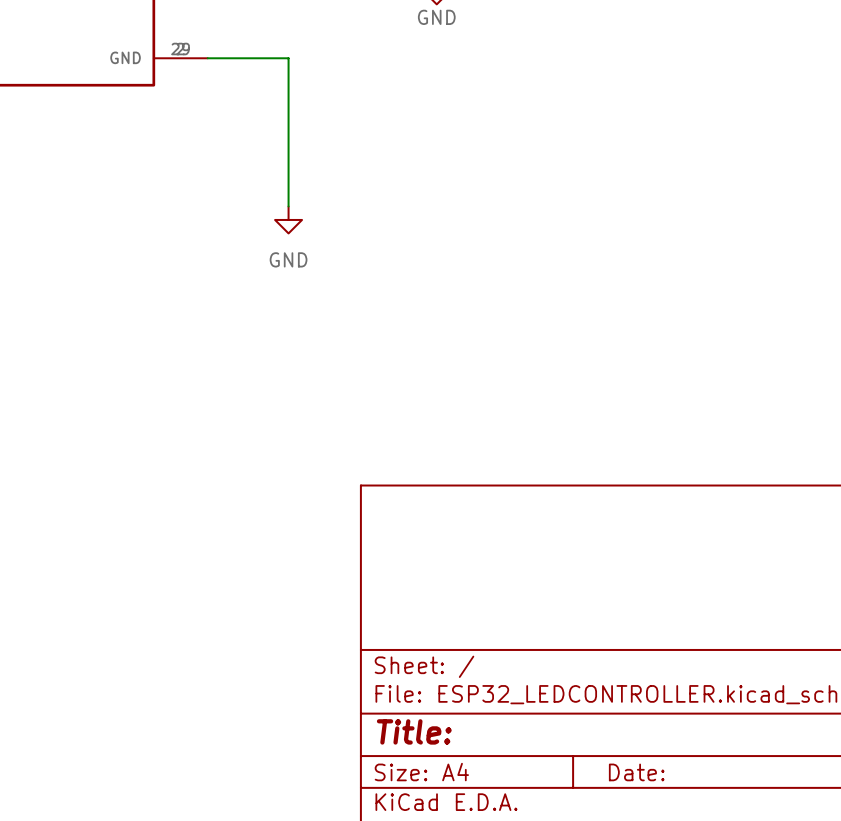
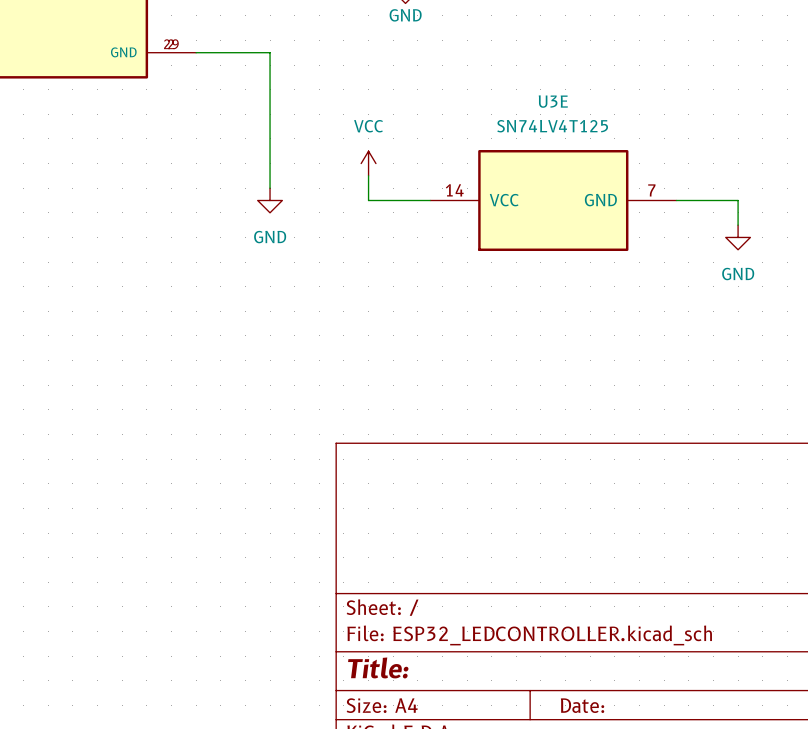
power symbol: none -> VCC (368, 163)
wire: none -> (368, 175) (368, 200) (430, 200)
U3E: none -> SN74LV4T125 (553, 200)
wire: none -> (676, 200) (738, 200) (738, 225)
power symbol: none -> GND (738, 237)

